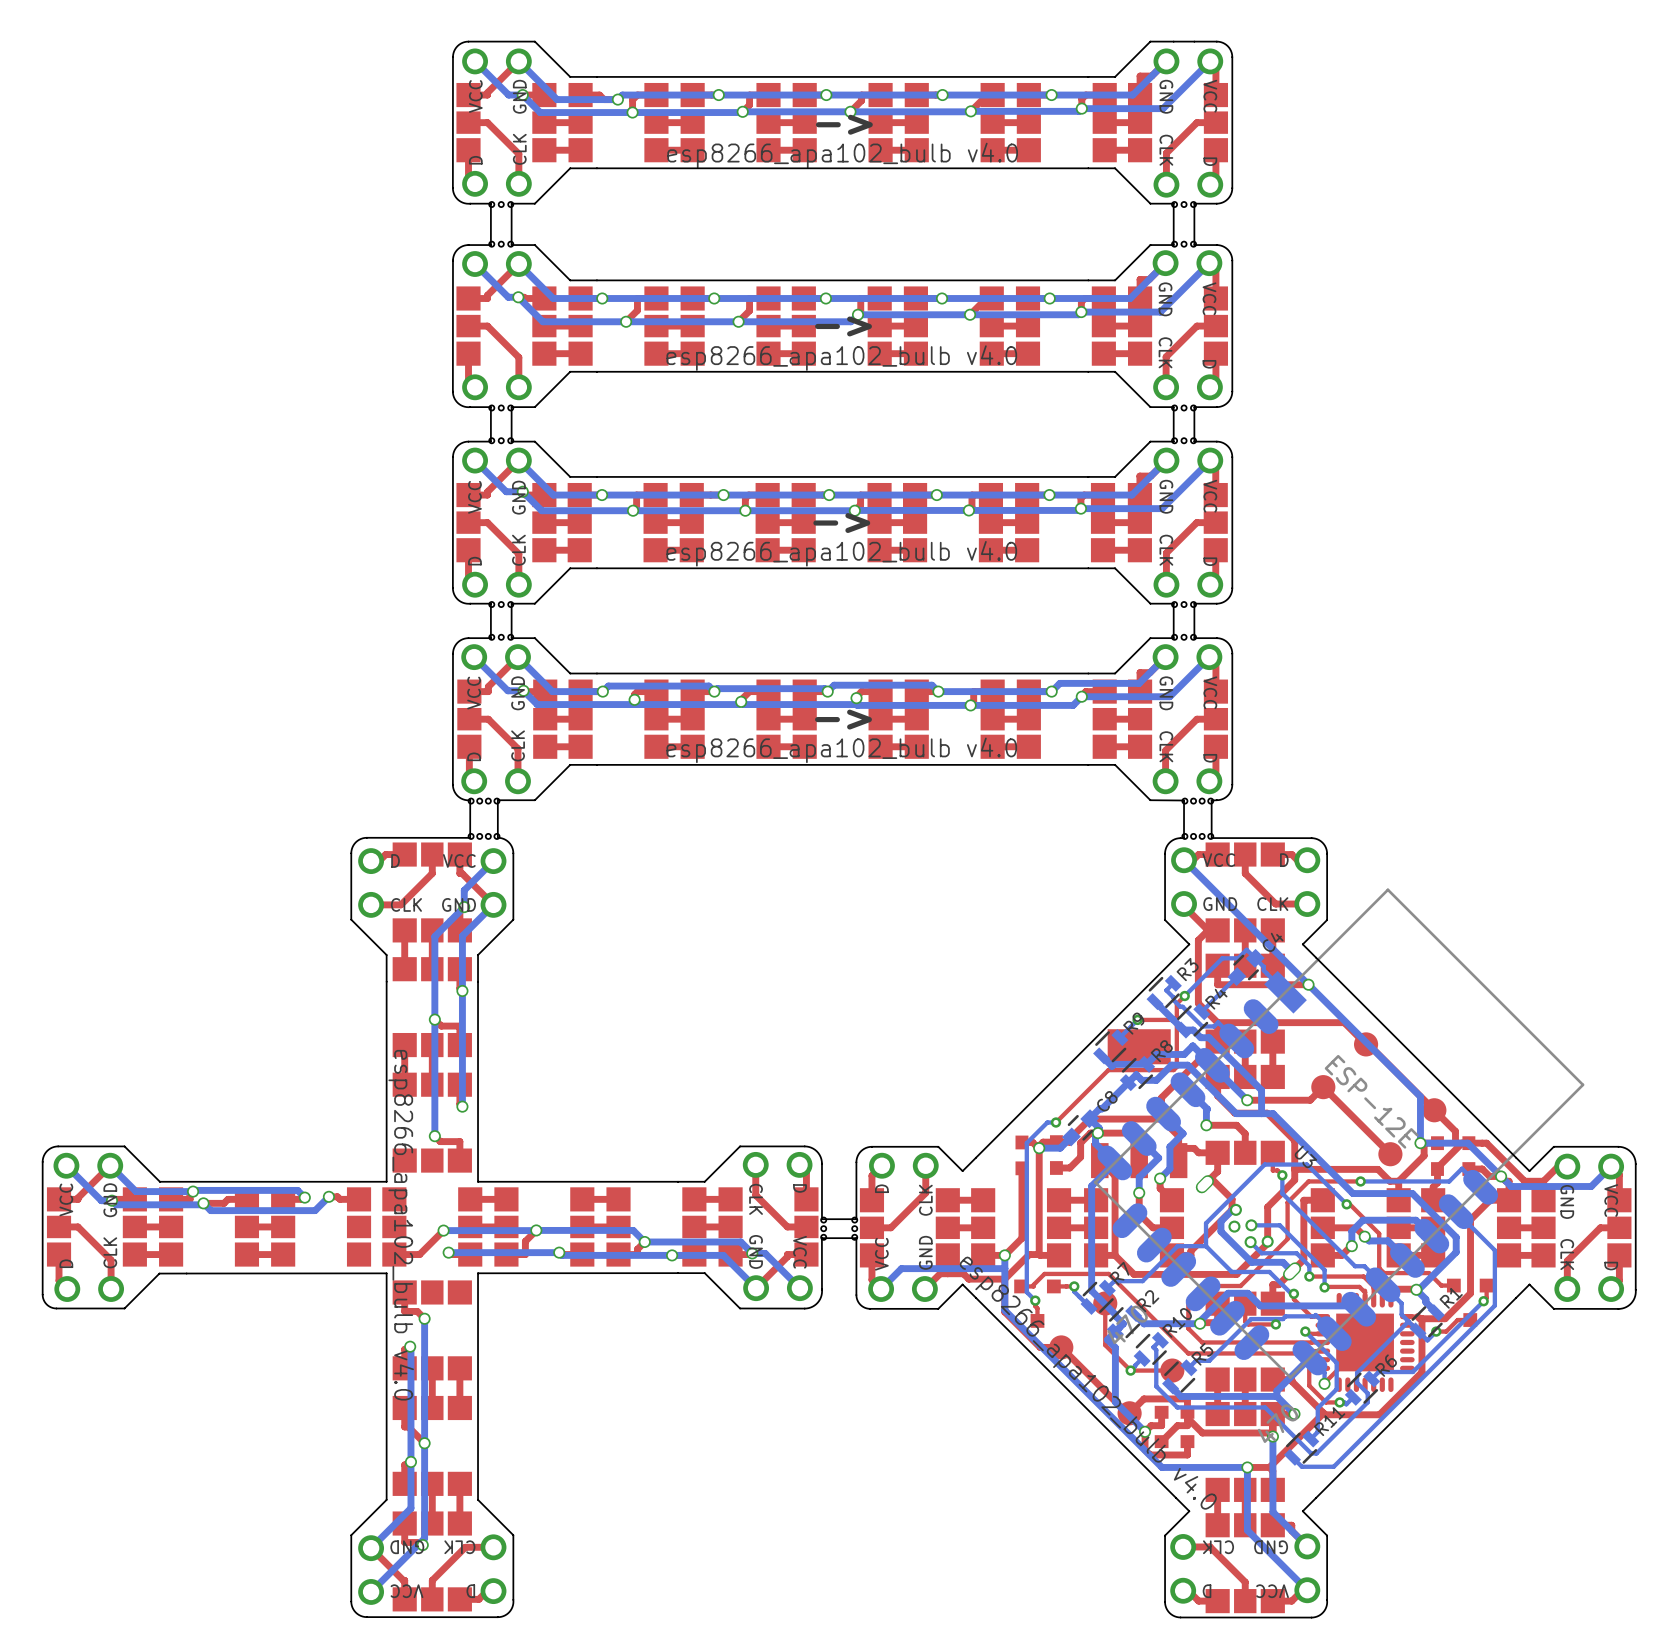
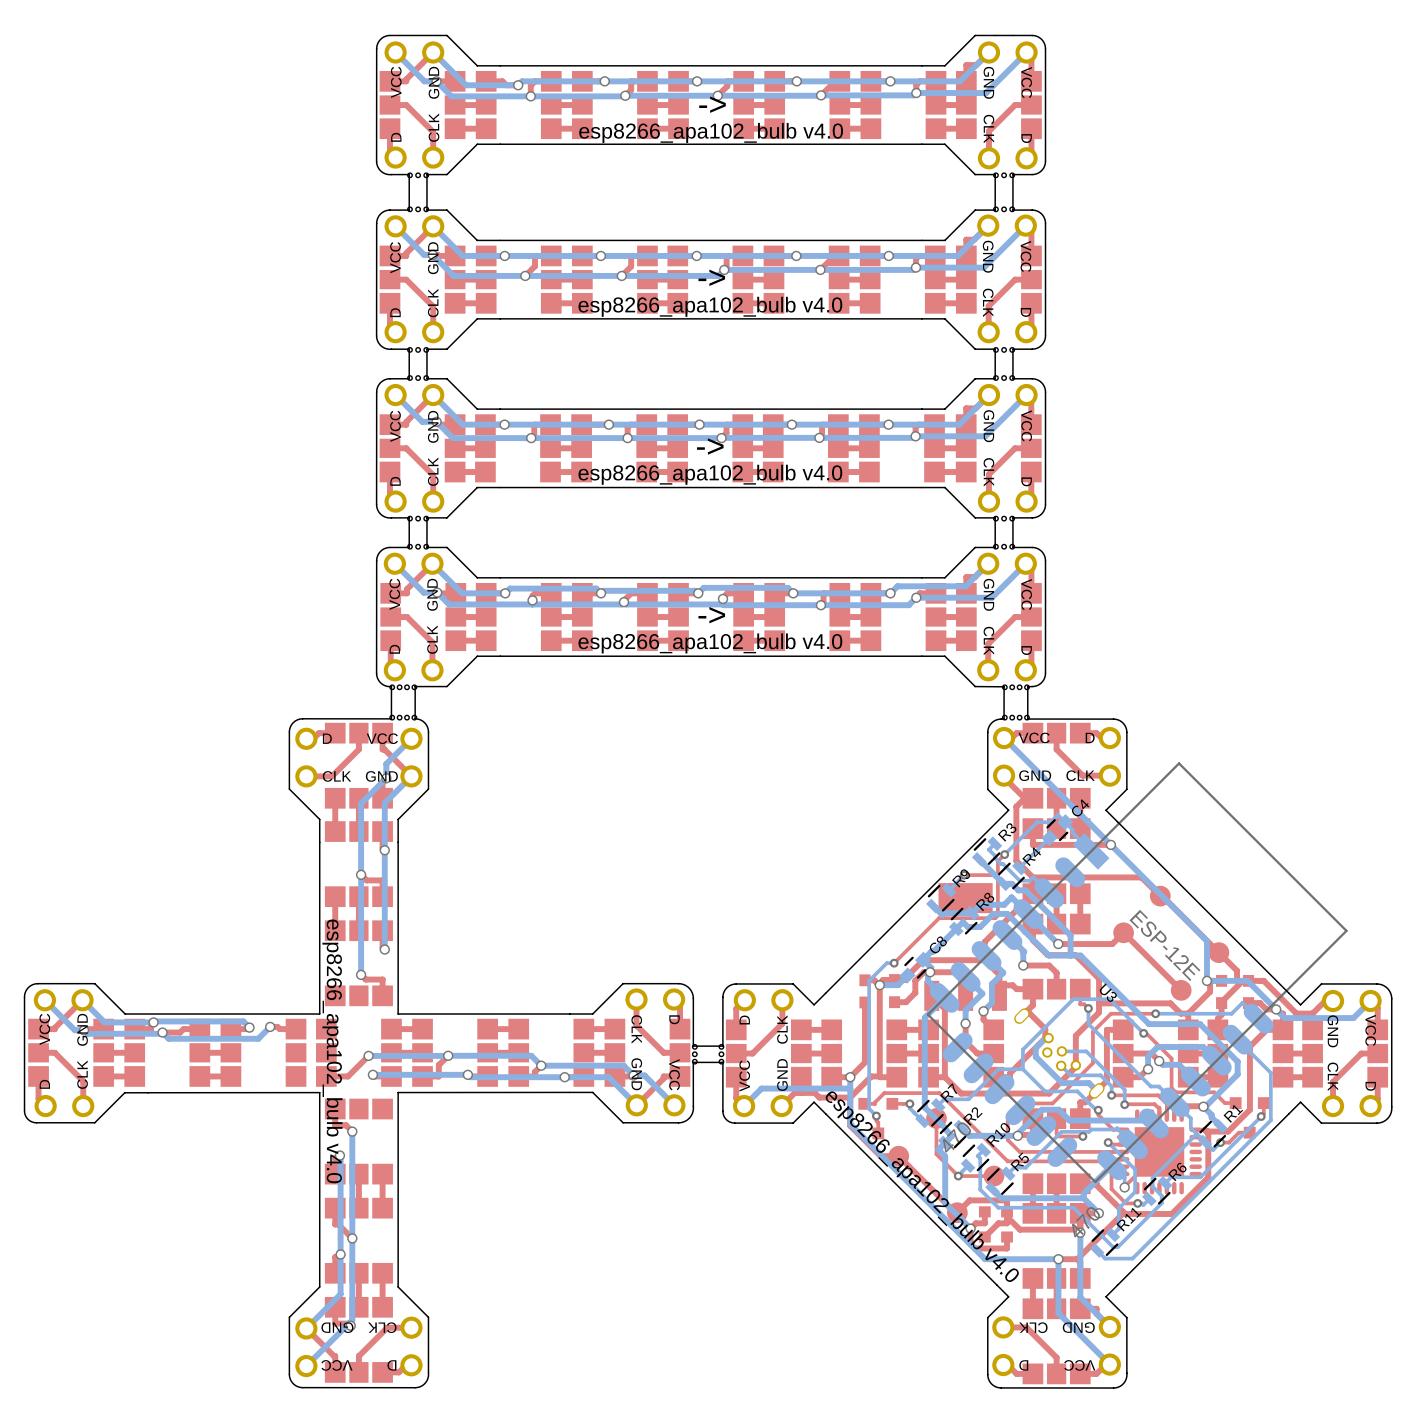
text: none -> VCC (395, 257)
text: none -> GND (433, 258)
text: none -> CLK (433, 303)
text: none -> D (395, 312)

